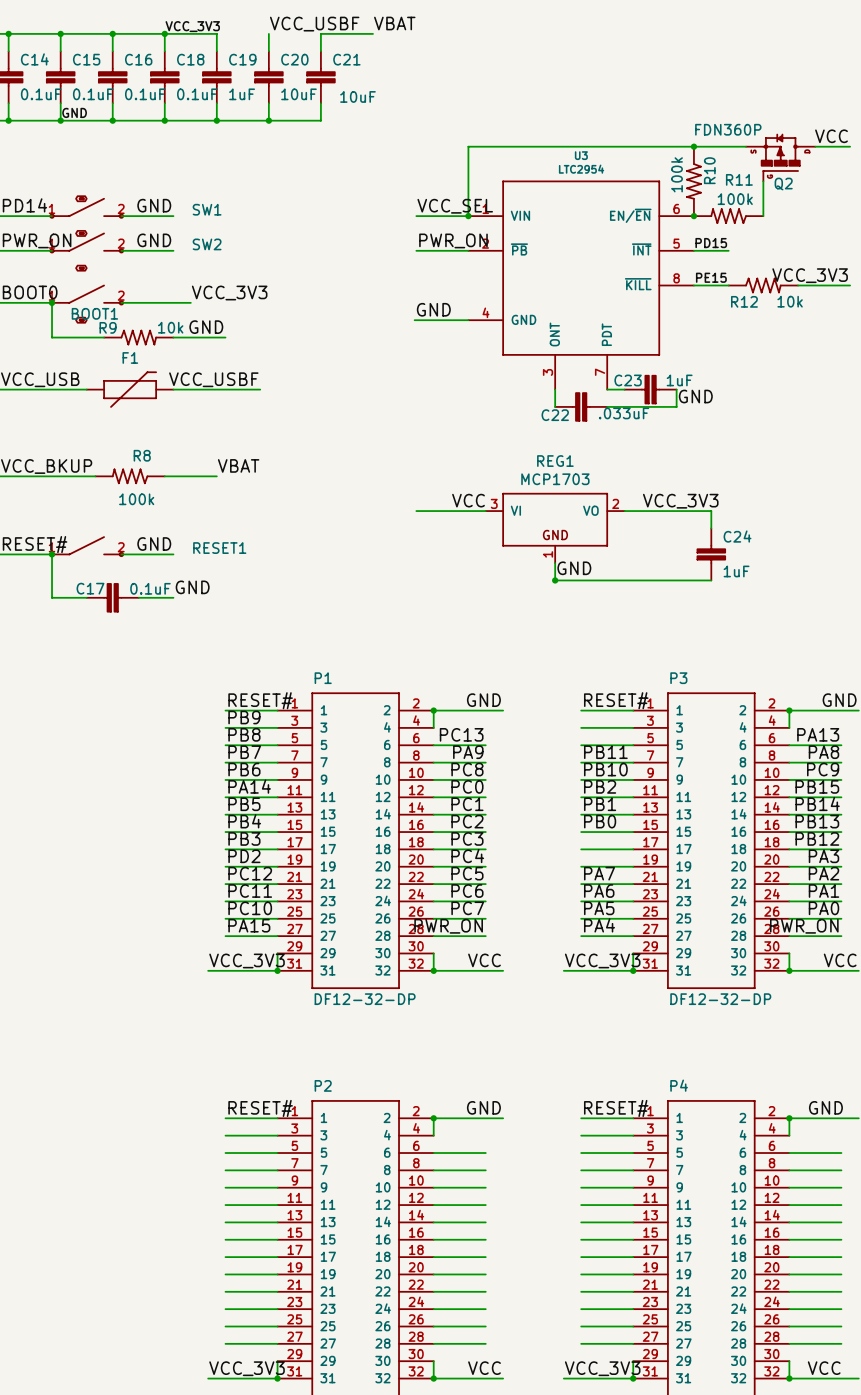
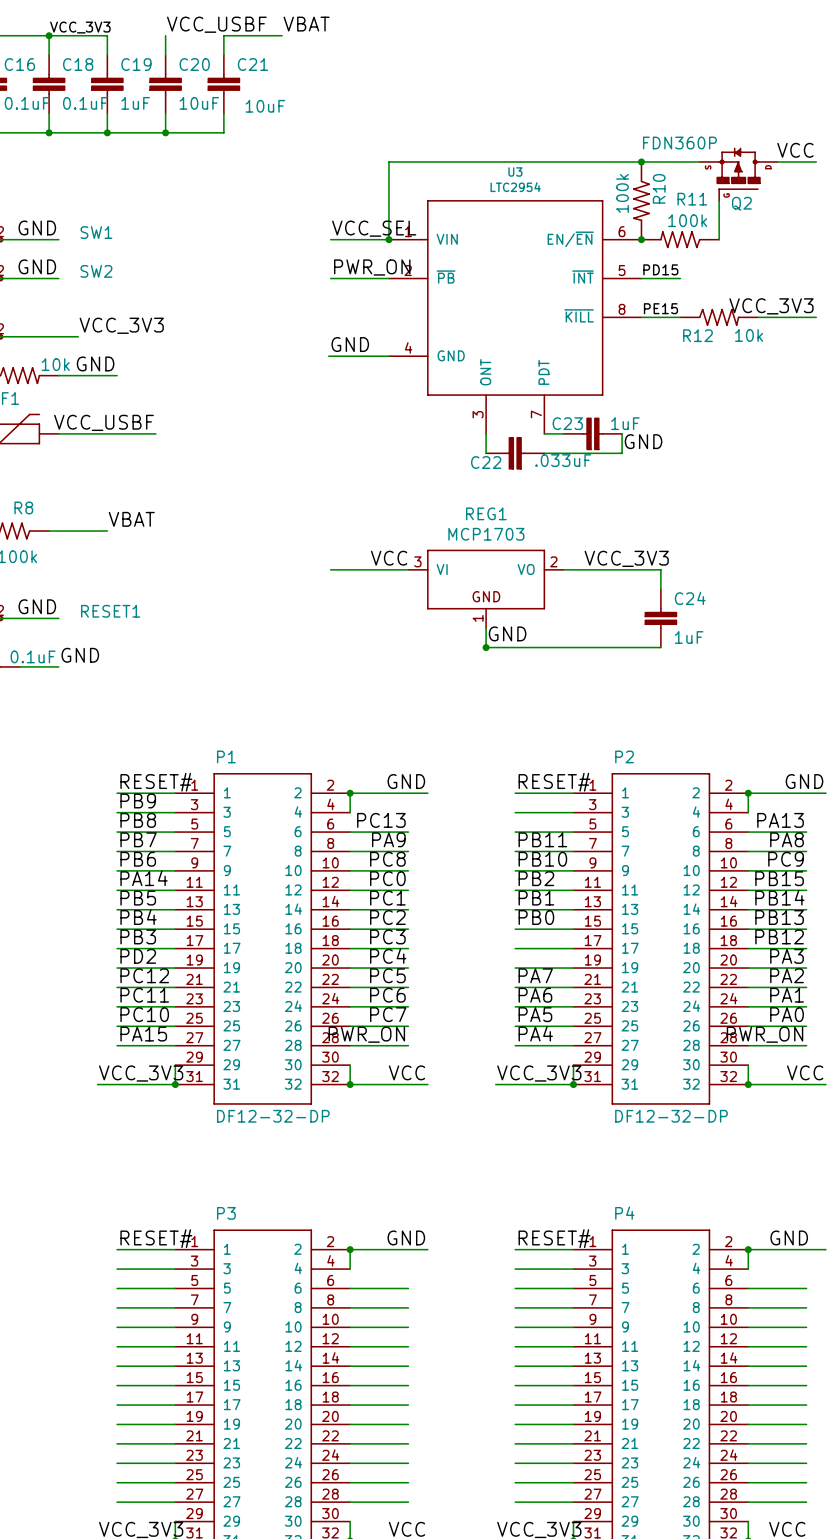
P3 name: P3 (678, 678) -> P2 (624, 756)
P2 name: P2 (323, 1085) -> P3 (226, 1213)

